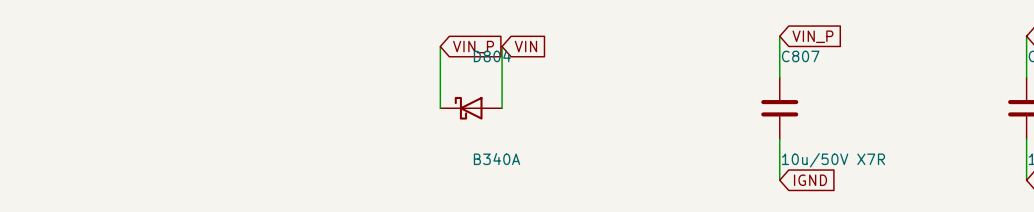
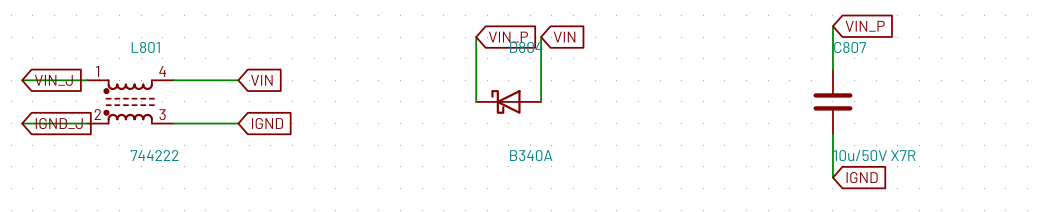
wire: none -> (22, 80) (87, 80)
wire: none -> (173, 80) (238, 80)
global label: none -> VIN (261, 80)
global label: none -> VIN_J (53, 80)
L801: none -> 744222 (130, 101)
wire: none -> (22, 123) (87, 123)
wire: none -> (173, 123) (238, 123)
global label: none -> IGND (267, 123)
global label: none -> IGND_J (59, 123)

